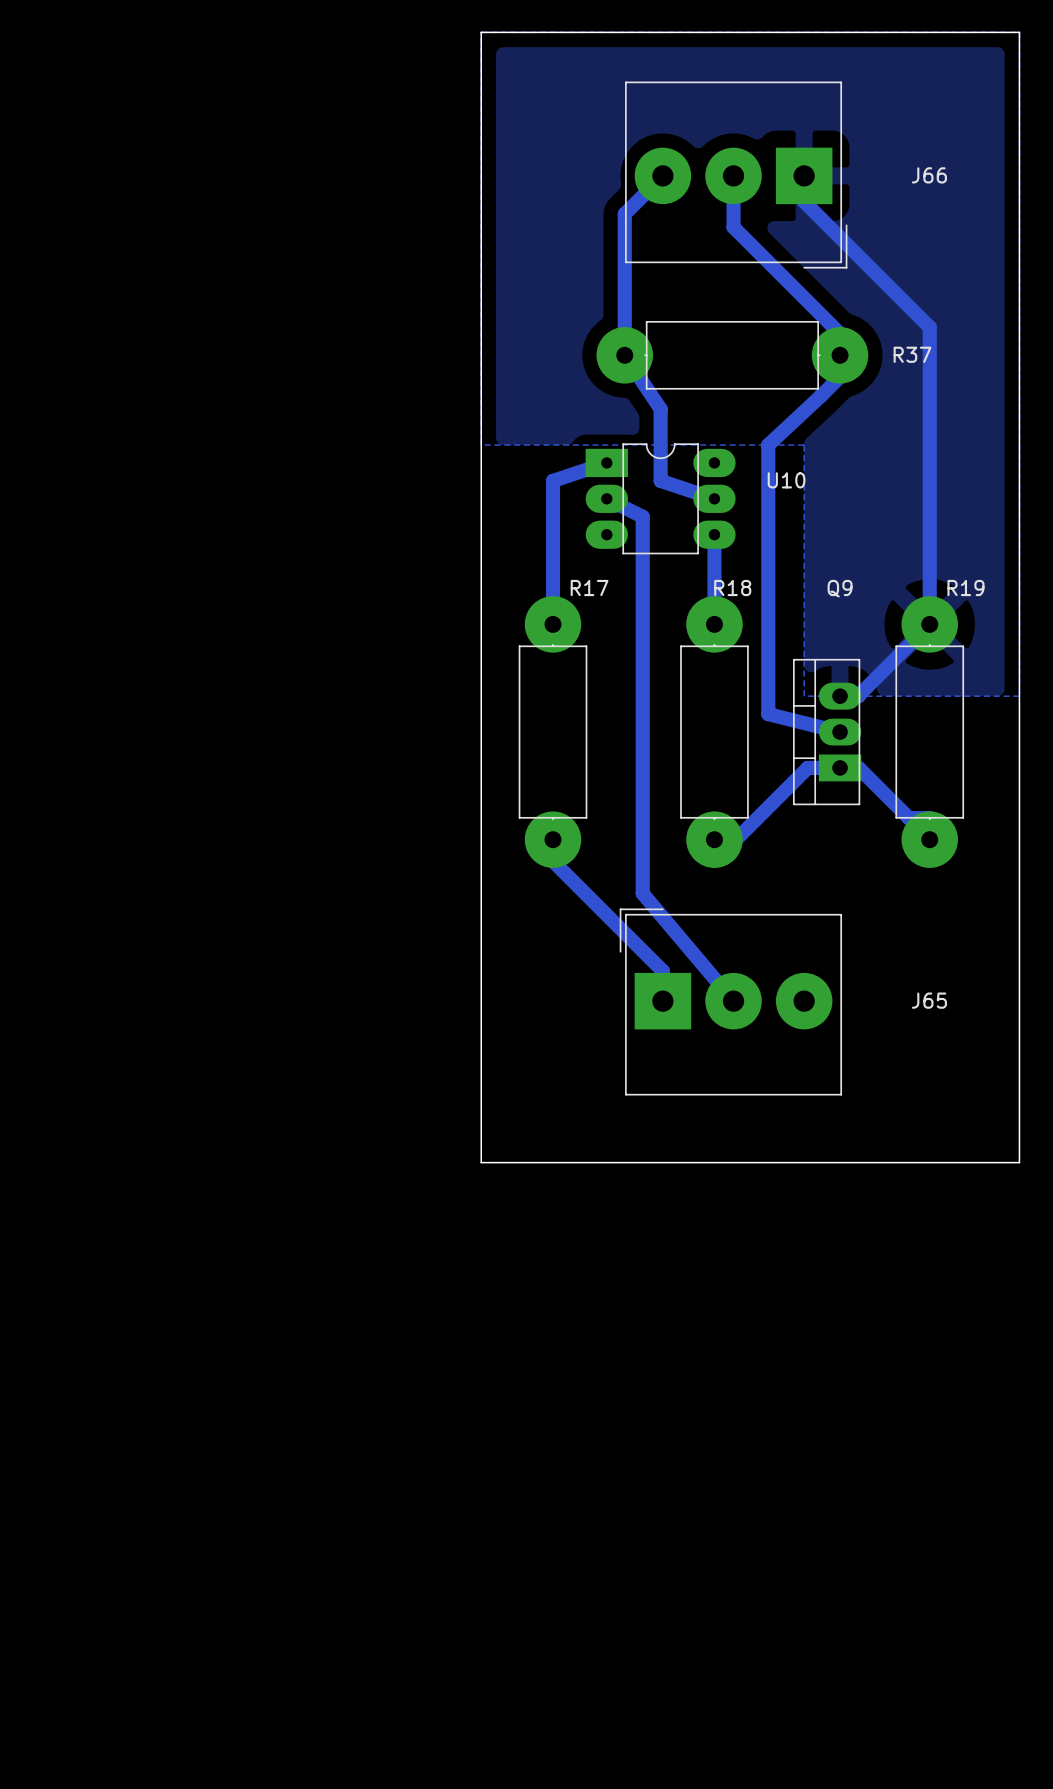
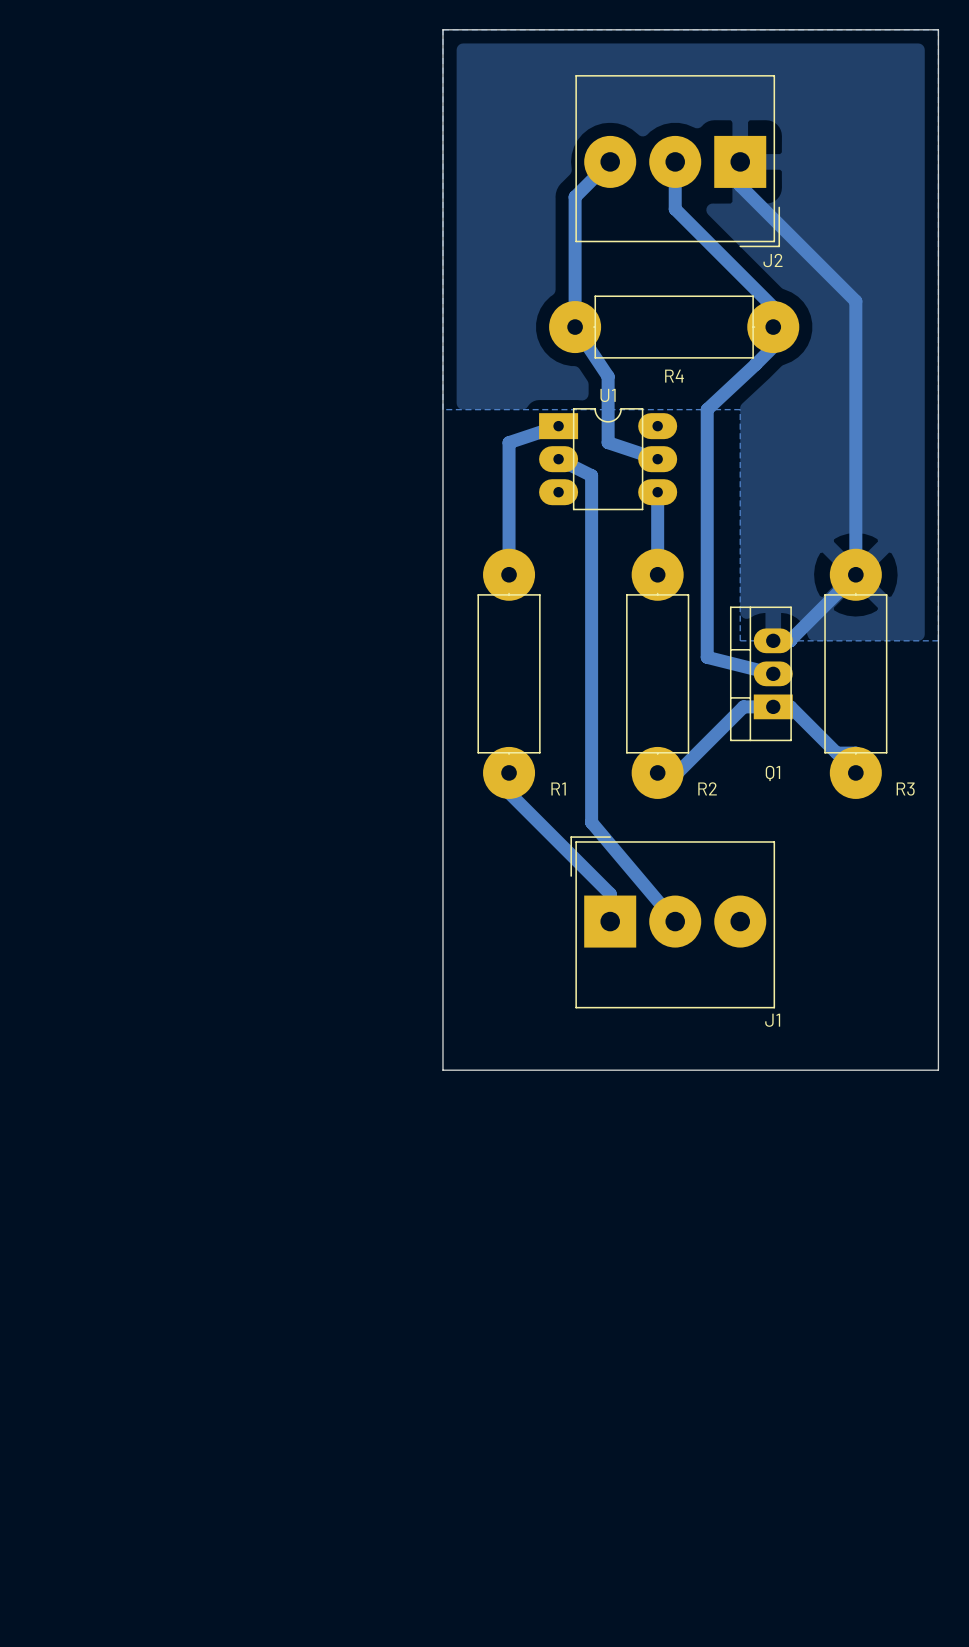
J66 name: J66 (929, 175) -> J2 (773, 260)
R37 name: R37 (912, 354) -> R4 (674, 376)
U10 name: U10 (786, 480) -> U1 (608, 395)
R17 name: R17 (589, 588) -> R1 (558, 788)
R18 name: R18 (732, 588) -> R2 (707, 788)
Q9 name: Q9 (840, 588) -> Q1 (772, 773)
R19 name: R19 (965, 588) -> R3 (905, 789)
J65 name: J65 (929, 1000) -> J1 (772, 1020)

